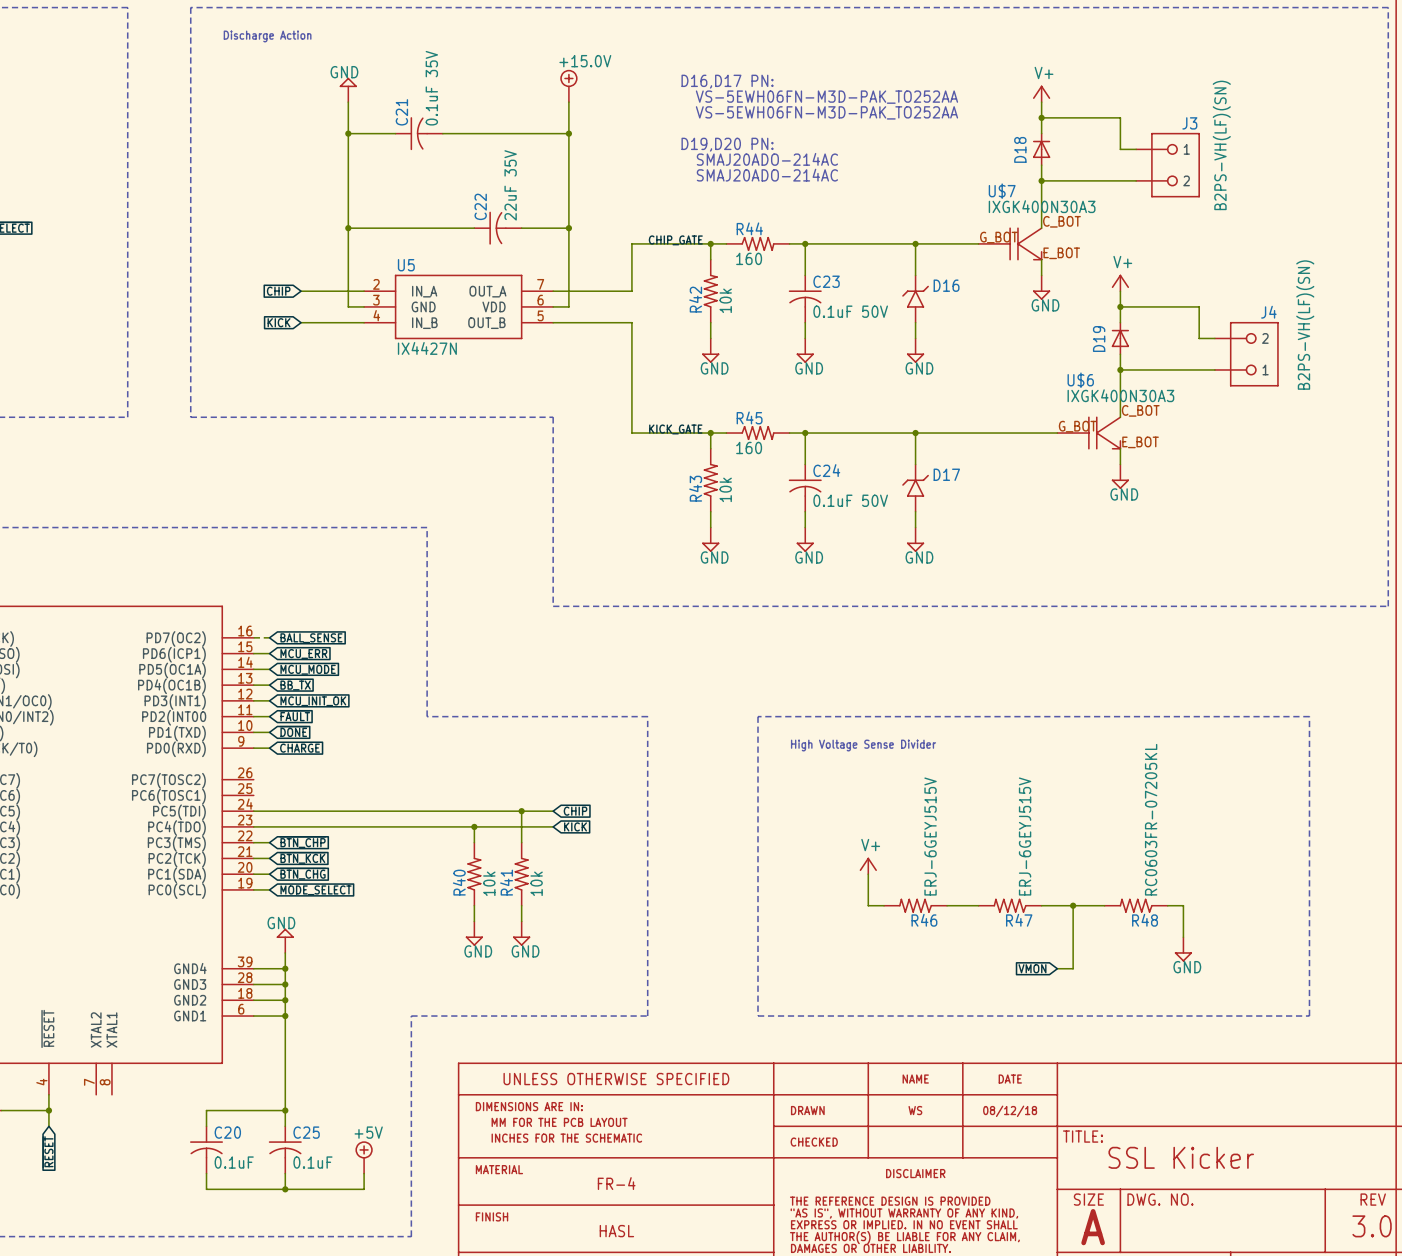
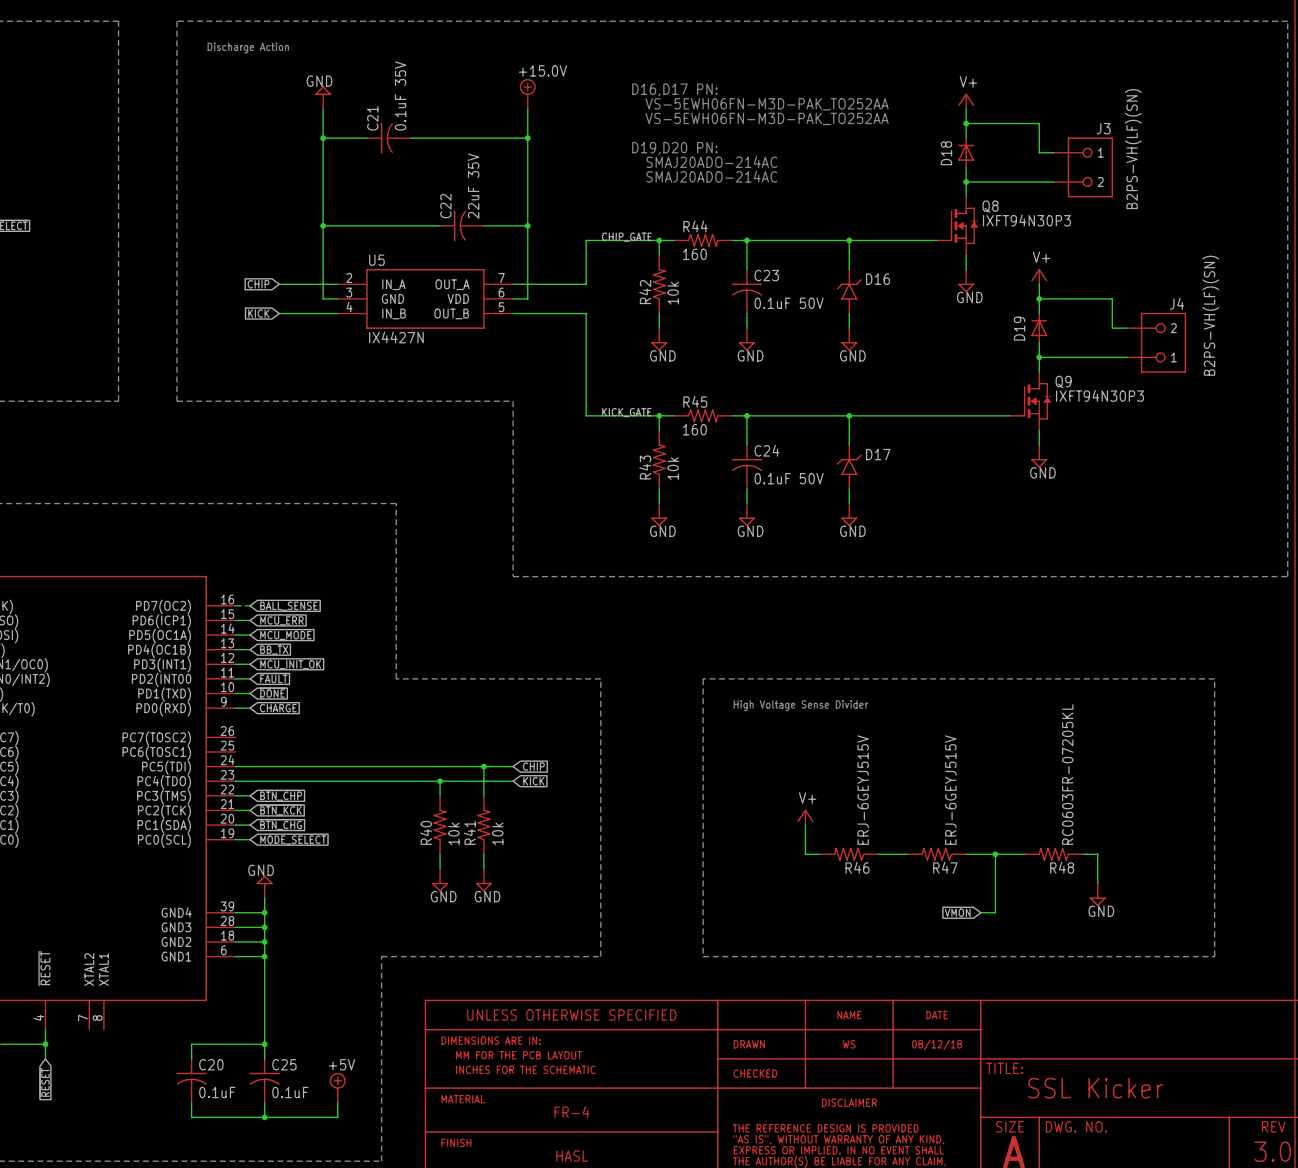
Q8: none -> IXFT94N30P3 (957, 225)
U$7: IXGK400N30A3 (1010, 243) -> none
Q9: none -> IXFT94N30P3 (1030, 401)
U$6: IXGK400N30A3 (1088, 433) -> none

